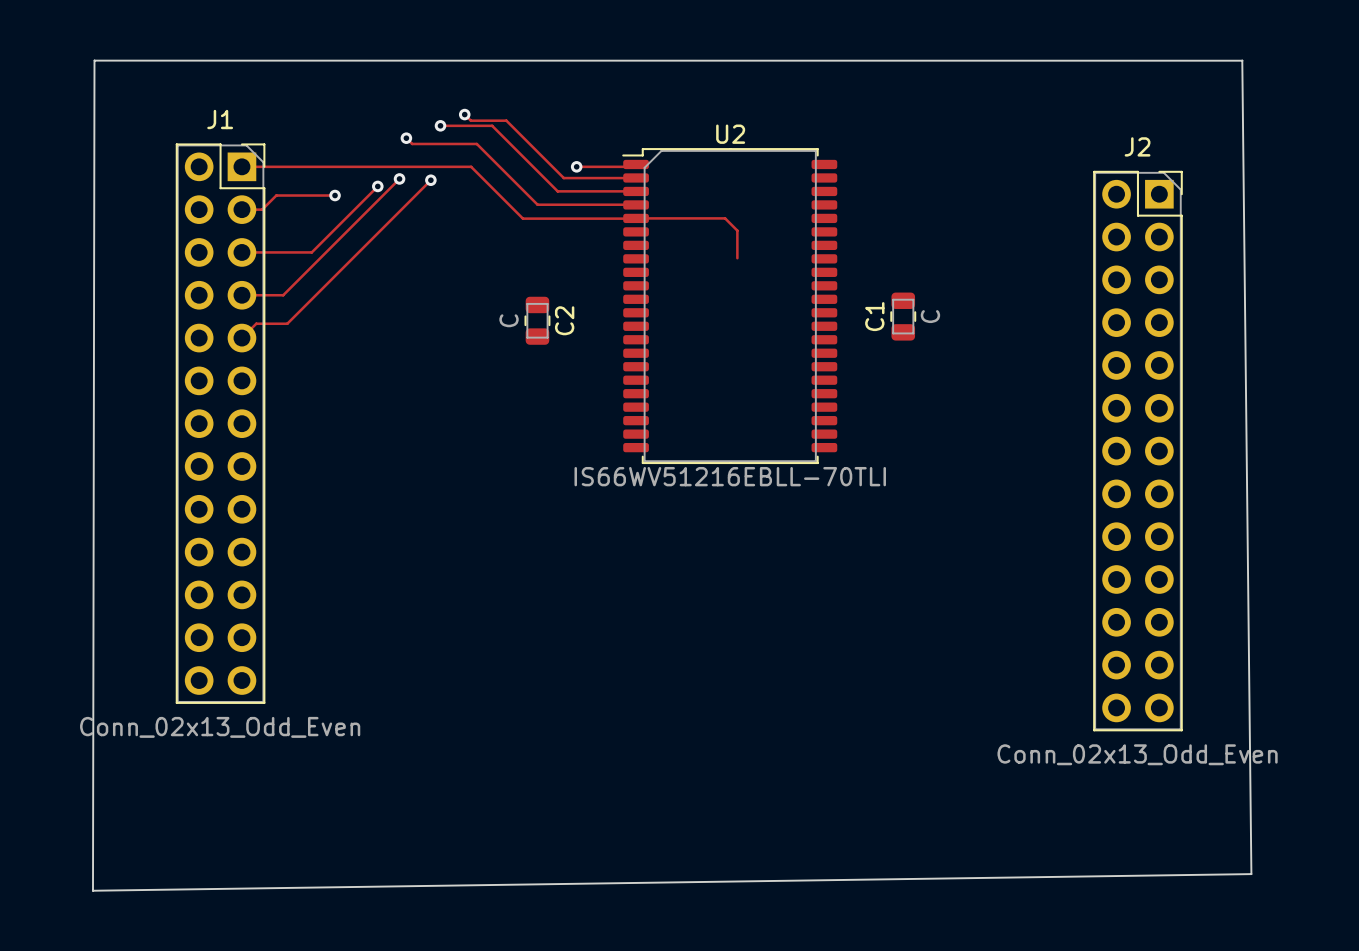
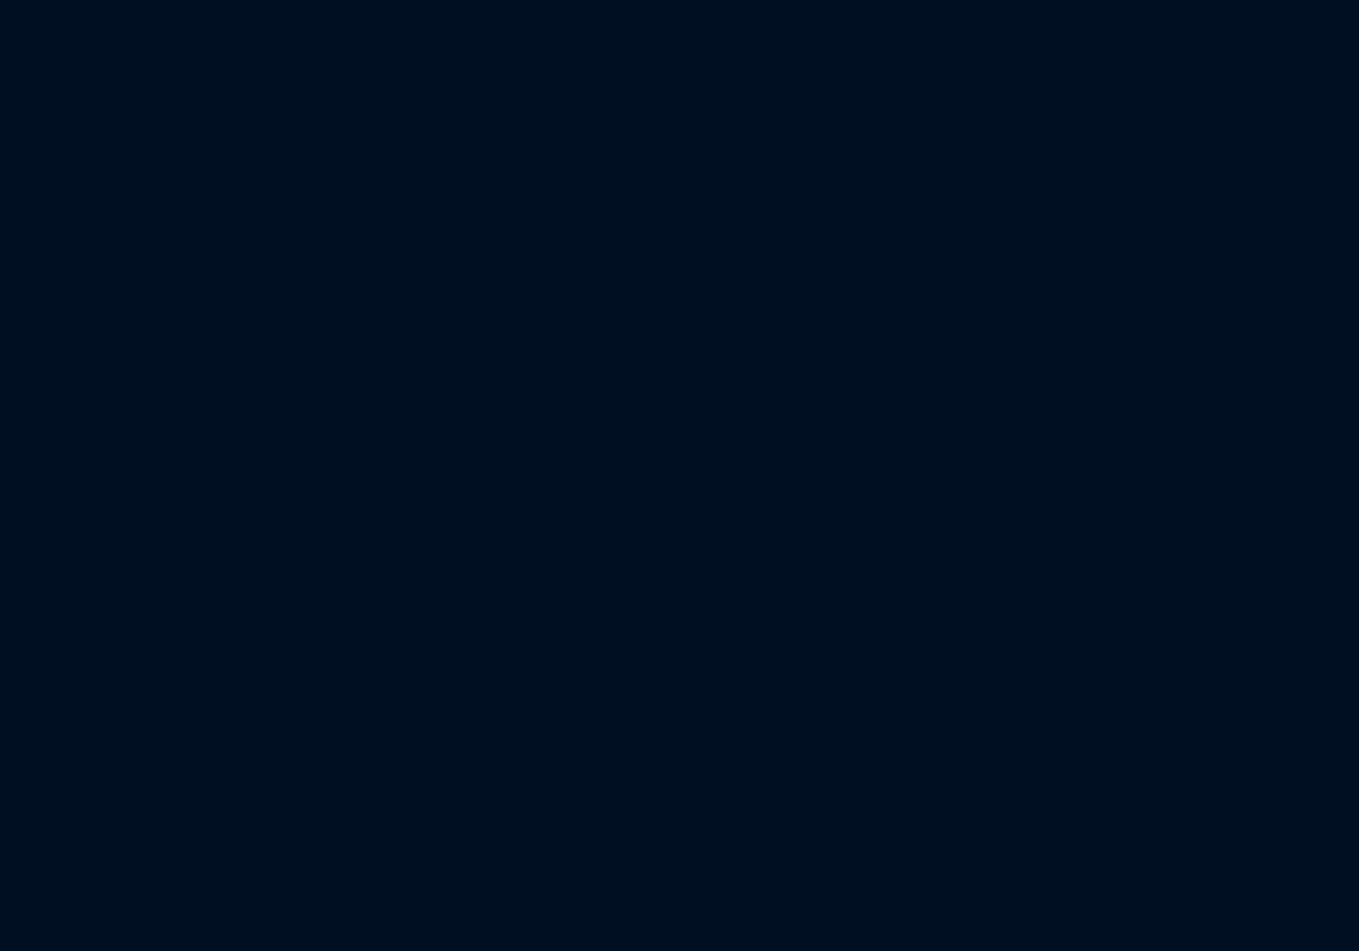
board edge: (94, 60) (92, 890) (1251, 874) (1242, 60) -> none
board edge: (94, 60) (1242, 60) -> none
track: (464, 114) (470, 120) (506, 120) (563, 178) (632, 178) -> none
via: (464, 114) -> none
track: (440, 125) (492, 125) (557, 191) (633, 191) -> none
via: (440, 125) -> none
track: (406, 138) (412, 143) (476, 143) (537, 204) (633, 204) -> none
via: (406, 138) -> none
track: (628, 163) (625, 166) (576, 166) -> none
track: (241, 166) (471, 166) (522, 218) (636, 218) -> none
via: (576, 166) -> none
track: (399, 178) (283, 295) (241, 295) -> none
via: (399, 178) -> none
track: (430, 180) (287, 323) (256, 323) (241, 338) -> none
via: (430, 180) -> none
track: (377, 186) (311, 252) (241, 252) -> none
via: (377, 186) -> none
track: (335, 195) (276, 195) (262, 209) (241, 209) -> none
via: (335, 195) -> none
track: (636, 218) (725, 218) (737, 230) (737, 258) -> none
U2: IS66WV51216EBLL-70TLI (729, 306) -> none
C1: C (903, 316) -> none
C2: C (537, 320) -> none
J1: Conn_02x13_Odd_Even (220, 423) -> none
J2: Conn_02x13_Odd_Even (1137, 451) -> none

